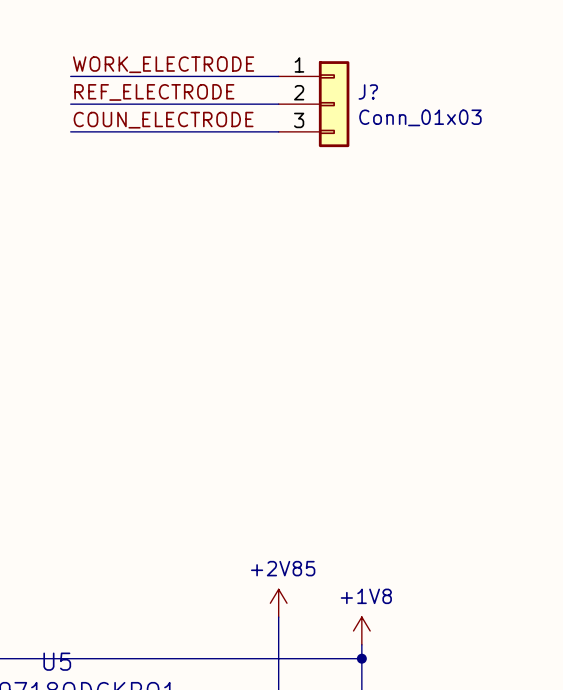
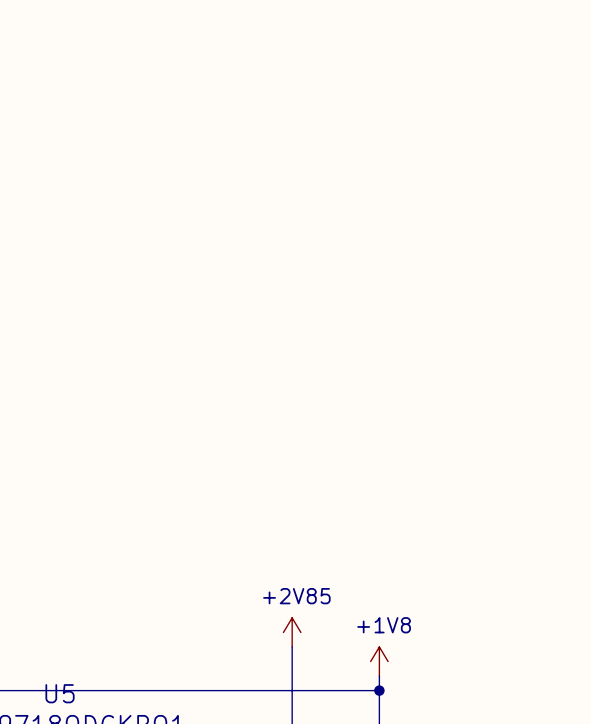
label: WORK_ELECTRODE (163, 64) -> none
wire: (70, 76) (278, 76) -> none
label: REF_ELECTRODE (154, 92) -> none
wire: (70, 104) (278, 104) -> none
J?: Conn_01x03 (314, 104) -> none
label: COUN_ELECTRODE (163, 120) -> none
wire: (70, 131) (278, 131) -> none

